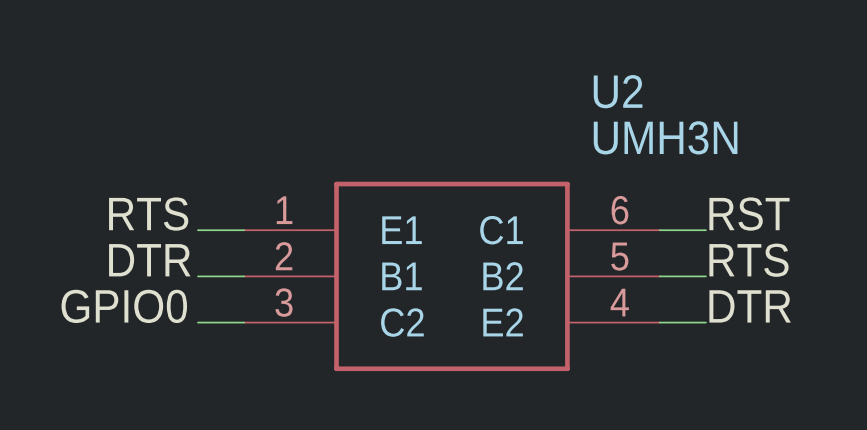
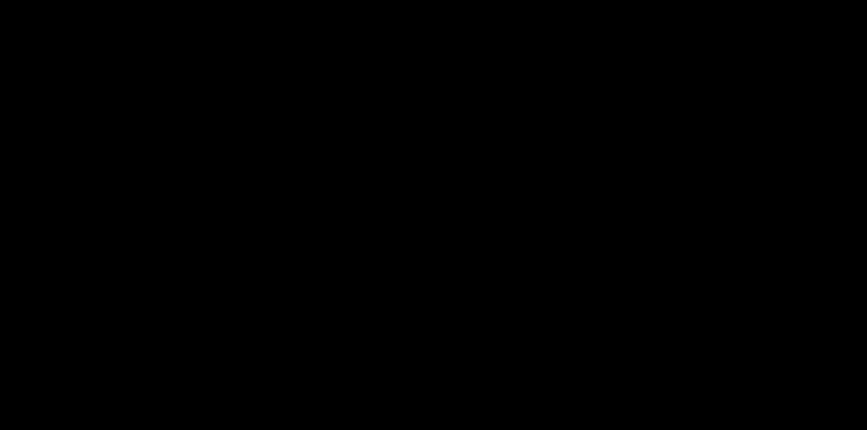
label: RTS (148, 214) -> none
label: RST (749, 214) -> none
wire: (197, 230) (244, 230) -> none
wire: (659, 230) (705, 230) -> none
label: DTR (149, 260) -> none
label: RTS (749, 260) -> none
wire: (197, 276) (244, 276) -> none
U2: UMH3N (451, 276) -> none
wire: (659, 276) (705, 276) -> none
label: GPIO0 (124, 306) -> none
label: DTR (750, 306) -> none
wire: (197, 322) (244, 322) -> none
wire: (659, 322) (705, 322) -> none

